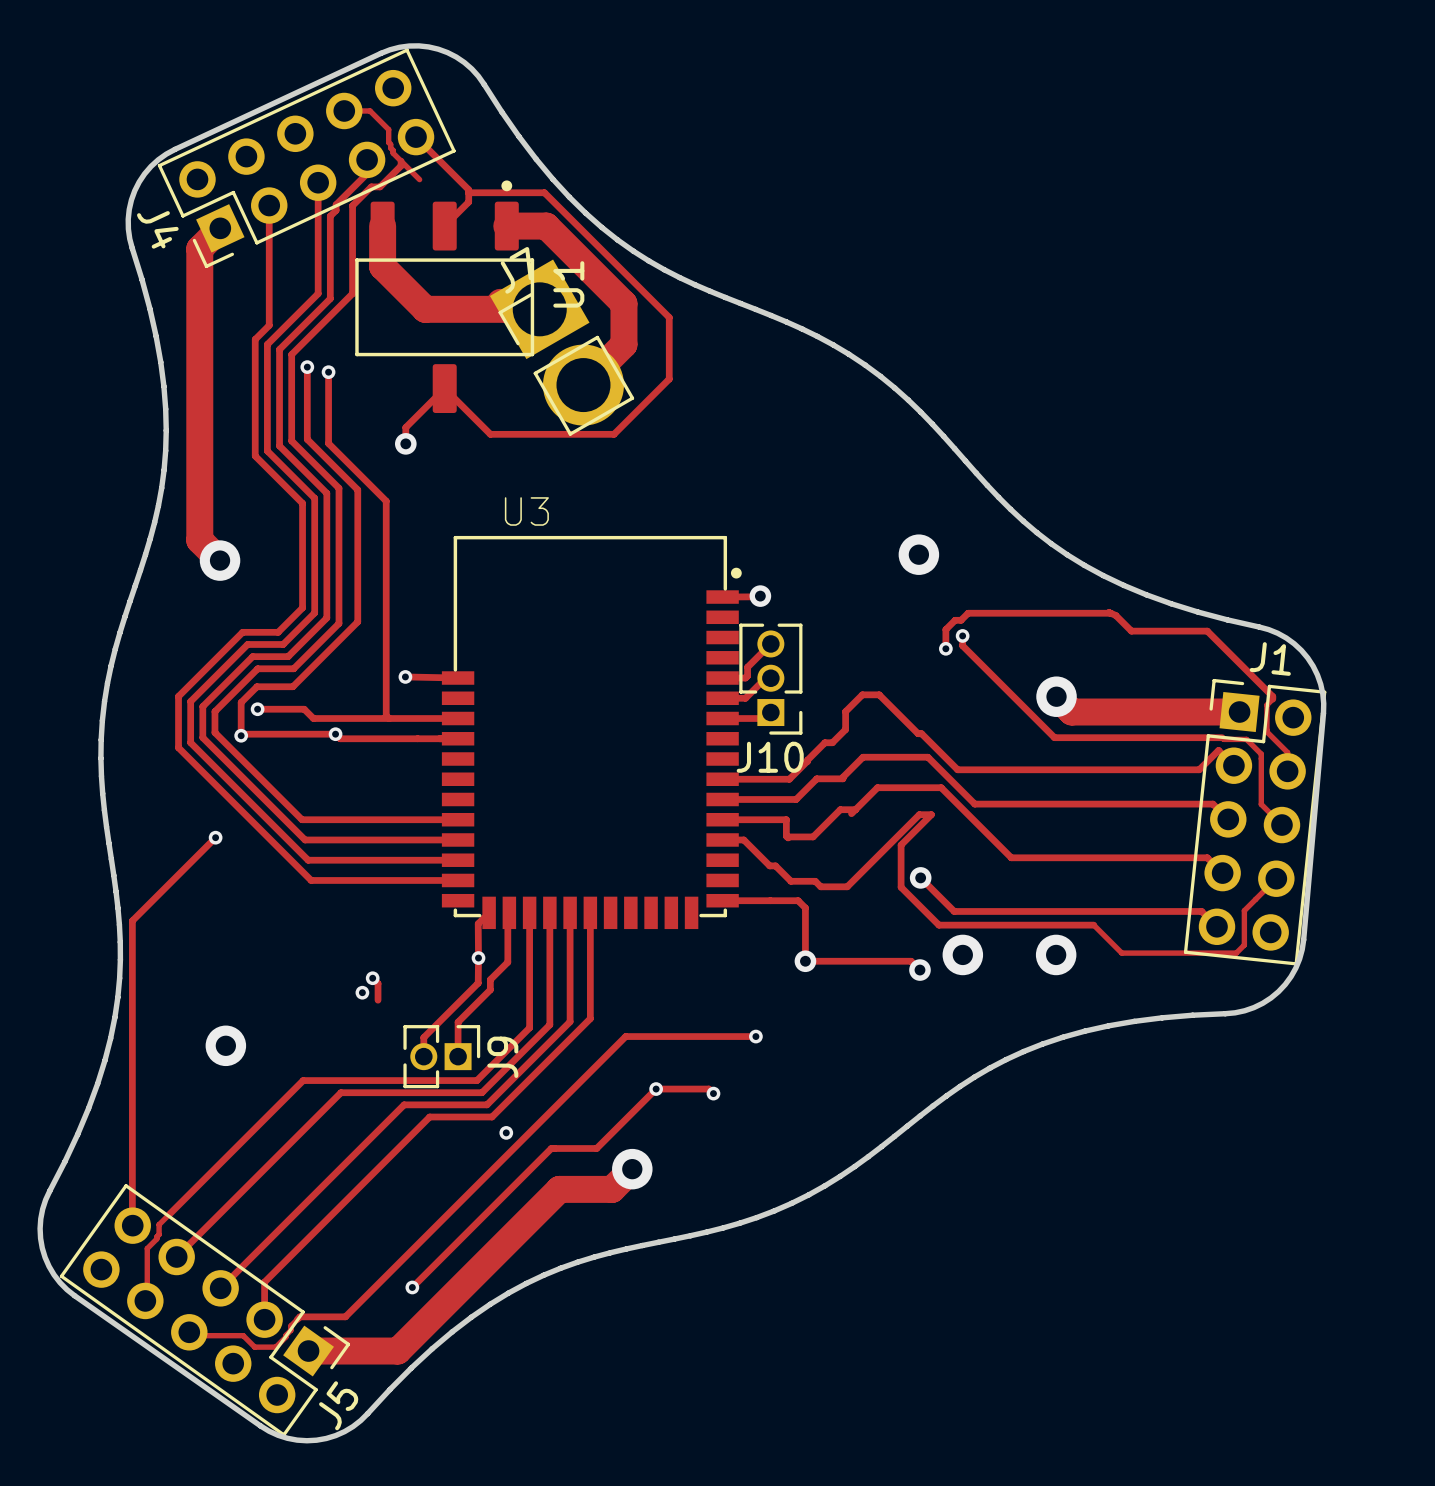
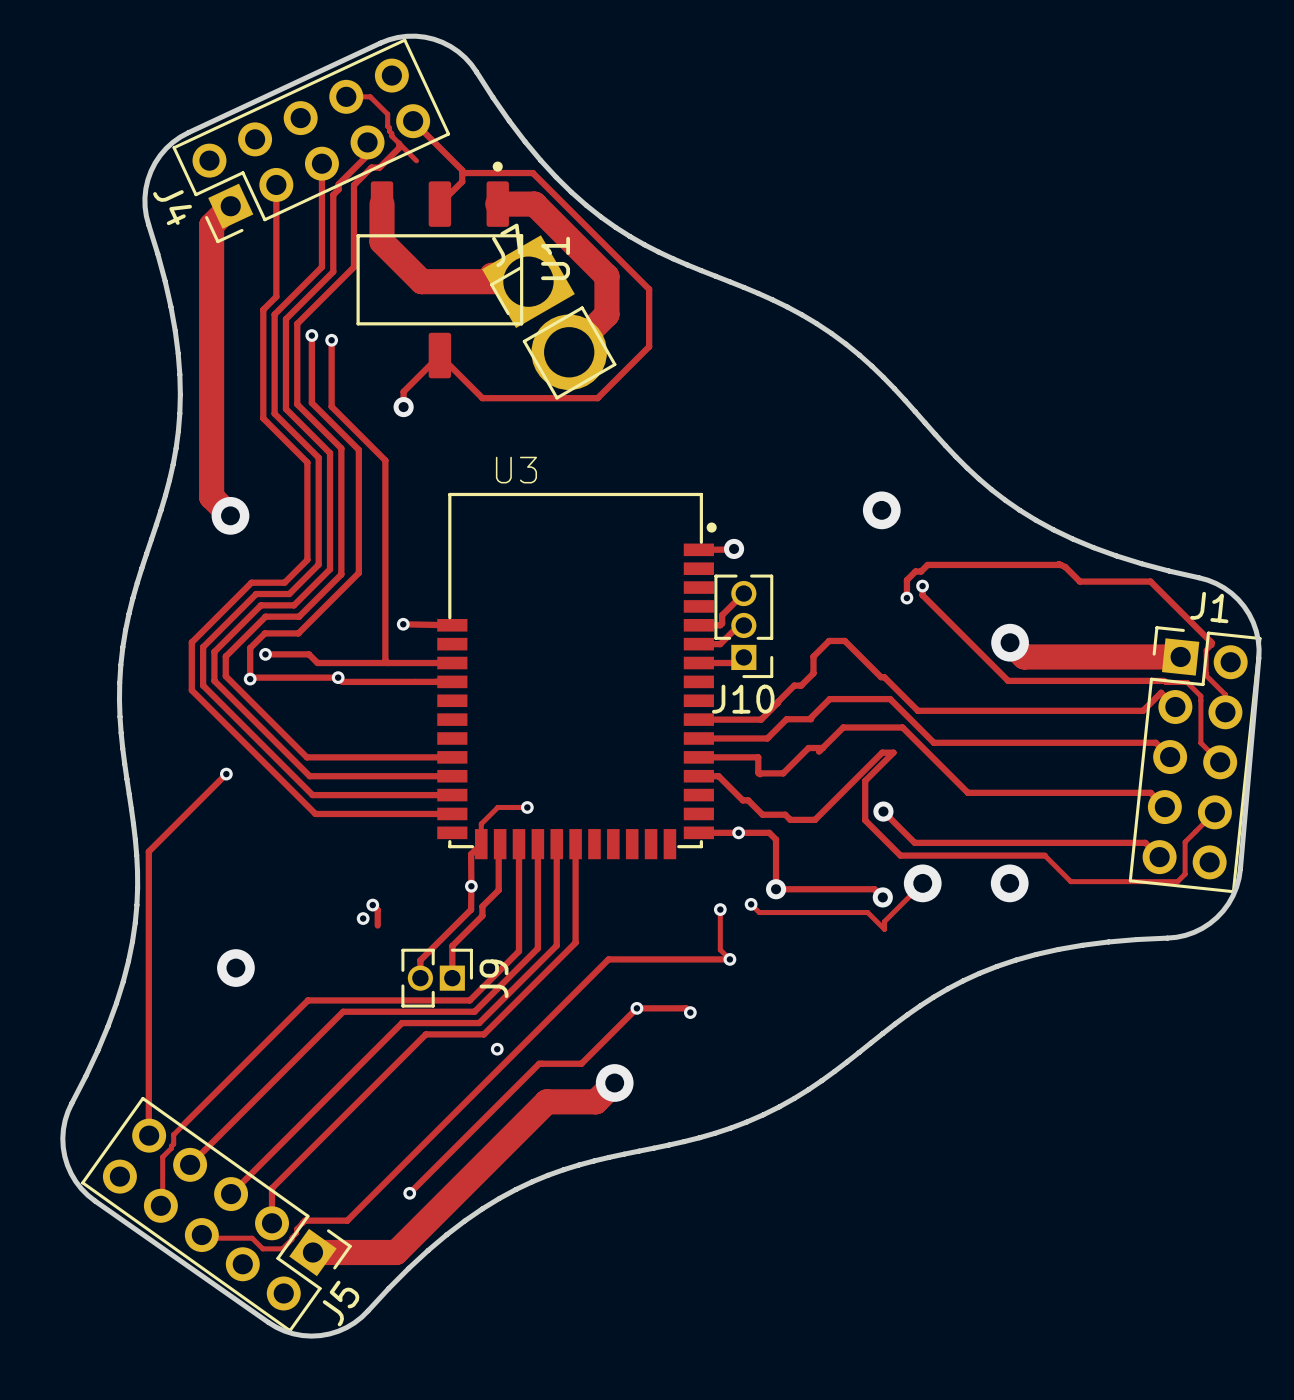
track: none -> (527, 807) (497, 807) (481, 824) (481, 844)
via: none -> (527, 807)
via: none -> (738, 832)
track: none -> (922, 883) (884, 921) (884, 929) (867, 912) (759, 912) (751, 904)
via: none -> (751, 904)
track: none -> (720, 909) (720, 949) (729, 959)
via: none -> (720, 909)

